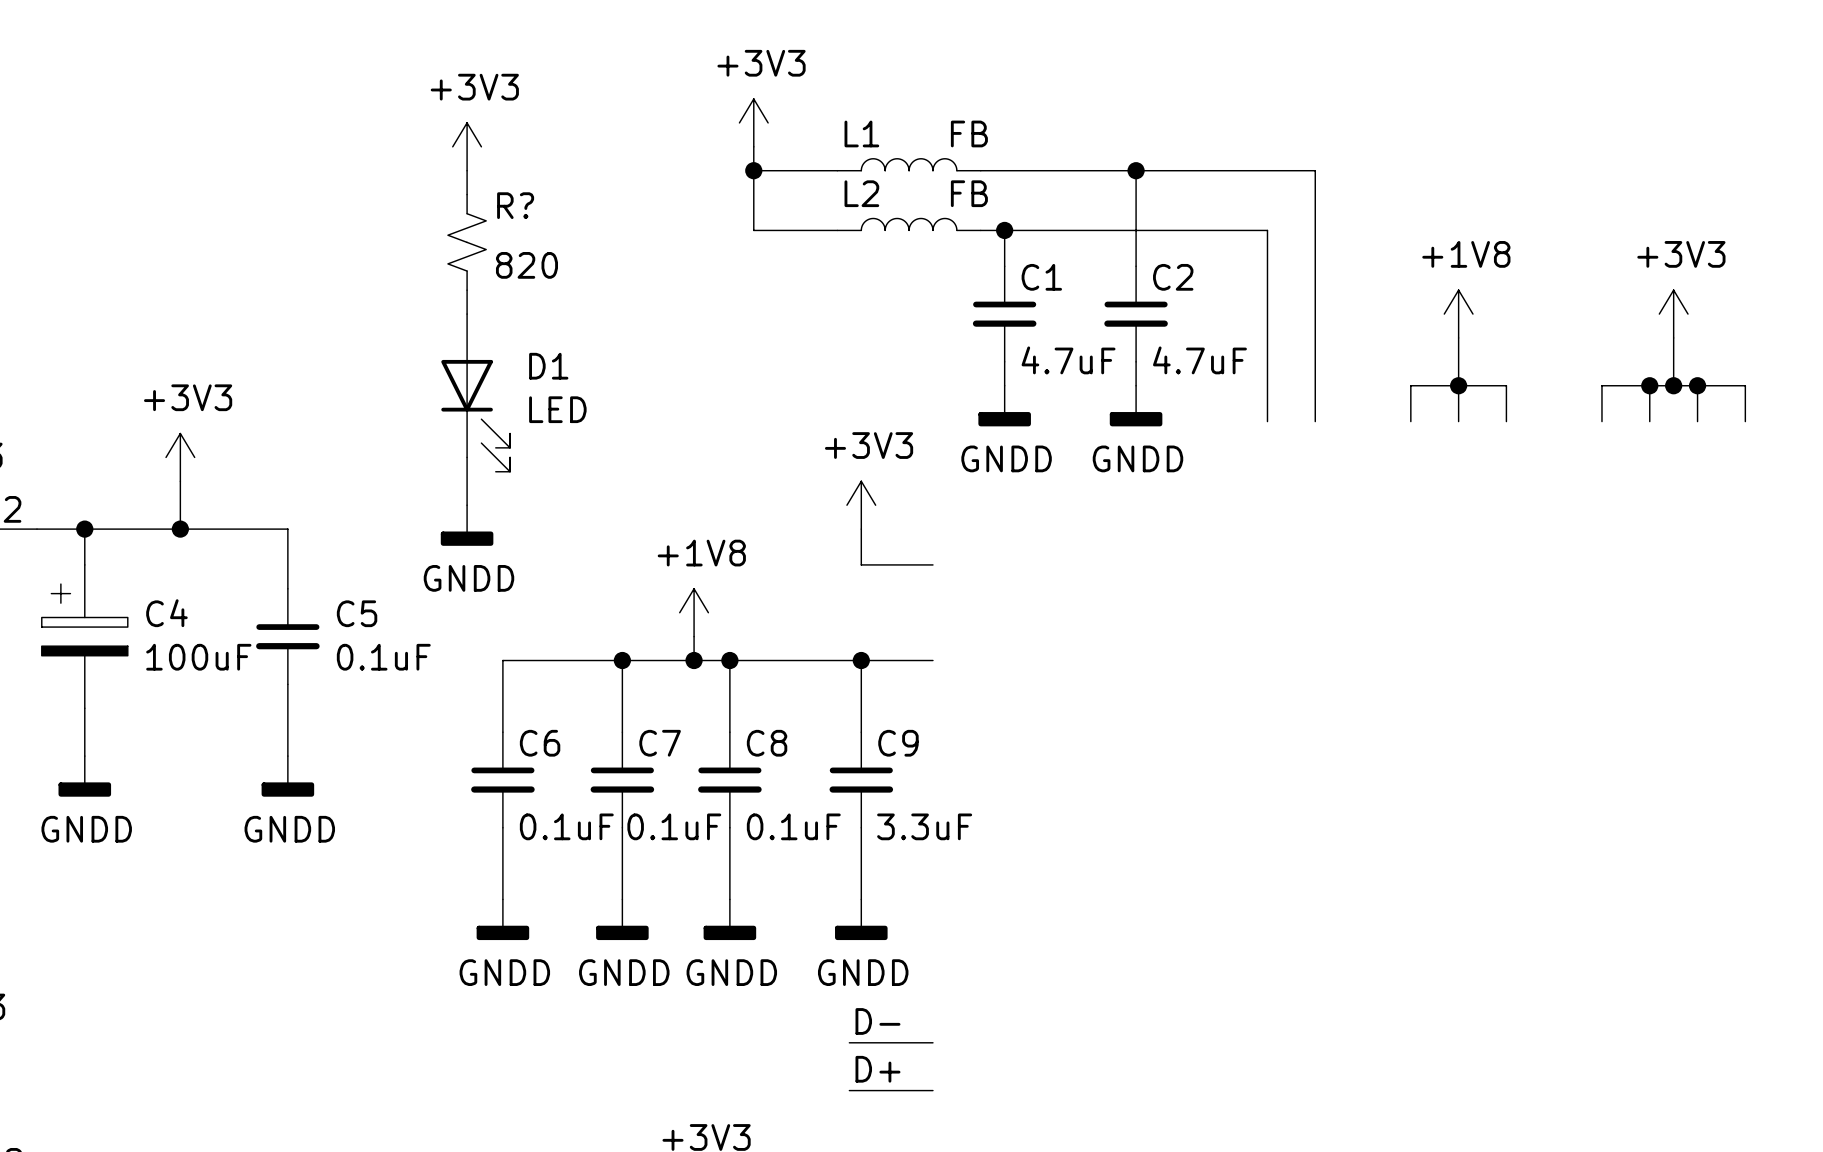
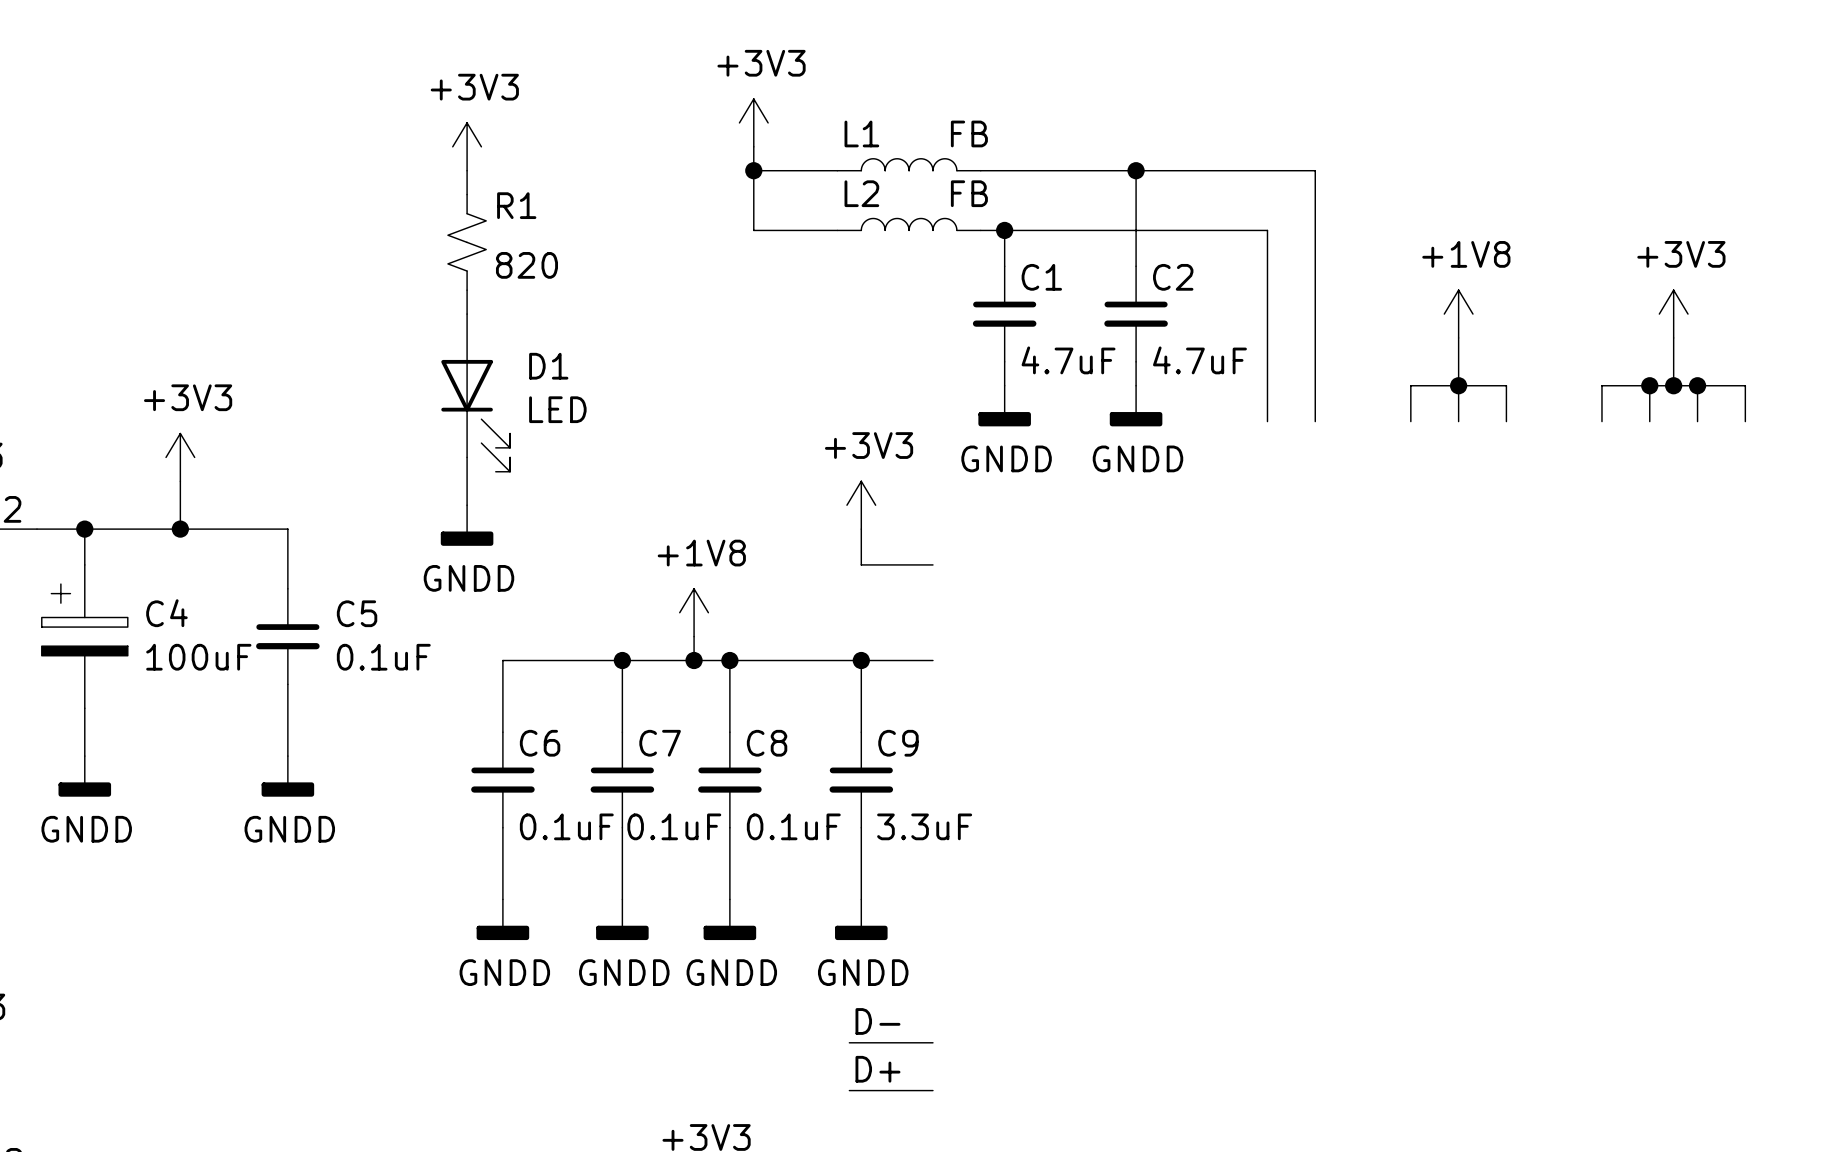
R? name: R? (515, 205) -> R1 (516, 205)

